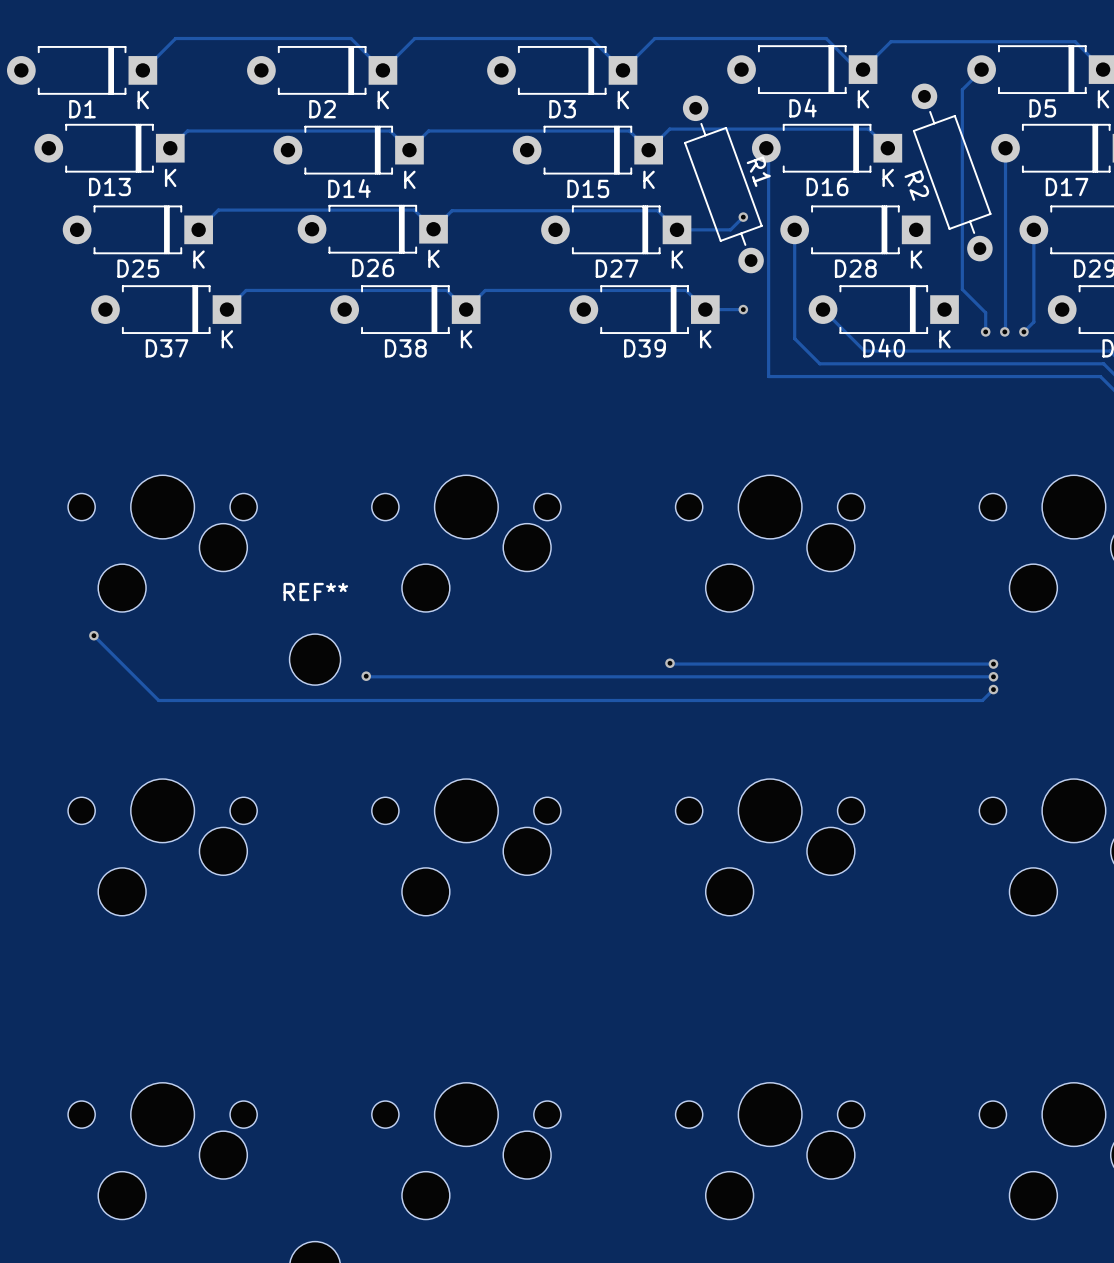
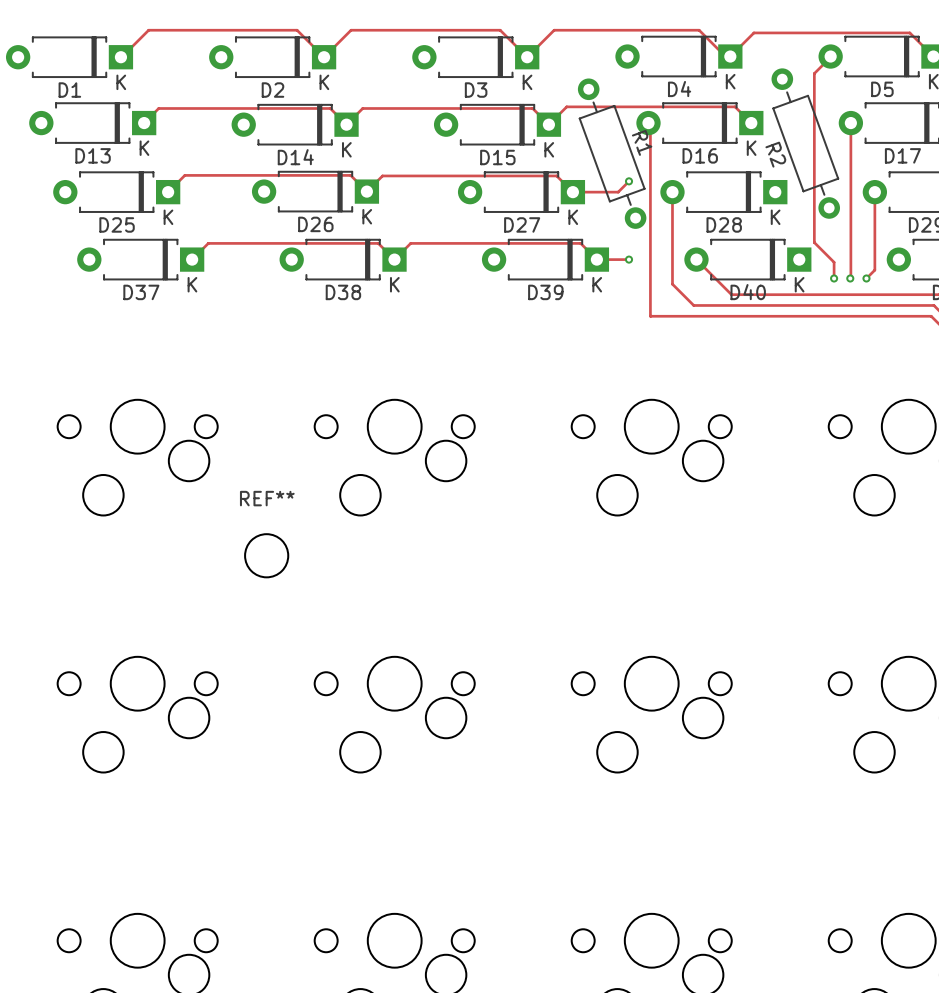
track: (93, 635) (158, 700) (982, 700) (993, 689) -> none
via: (93, 635) -> none
track: (670, 663) (993, 664) -> none
via: (670, 663) -> none
via: (993, 664) -> none
track: (366, 676) (993, 676) -> none
via: (366, 676) -> none
via: (993, 676) -> none
via: (993, 689) -> none

